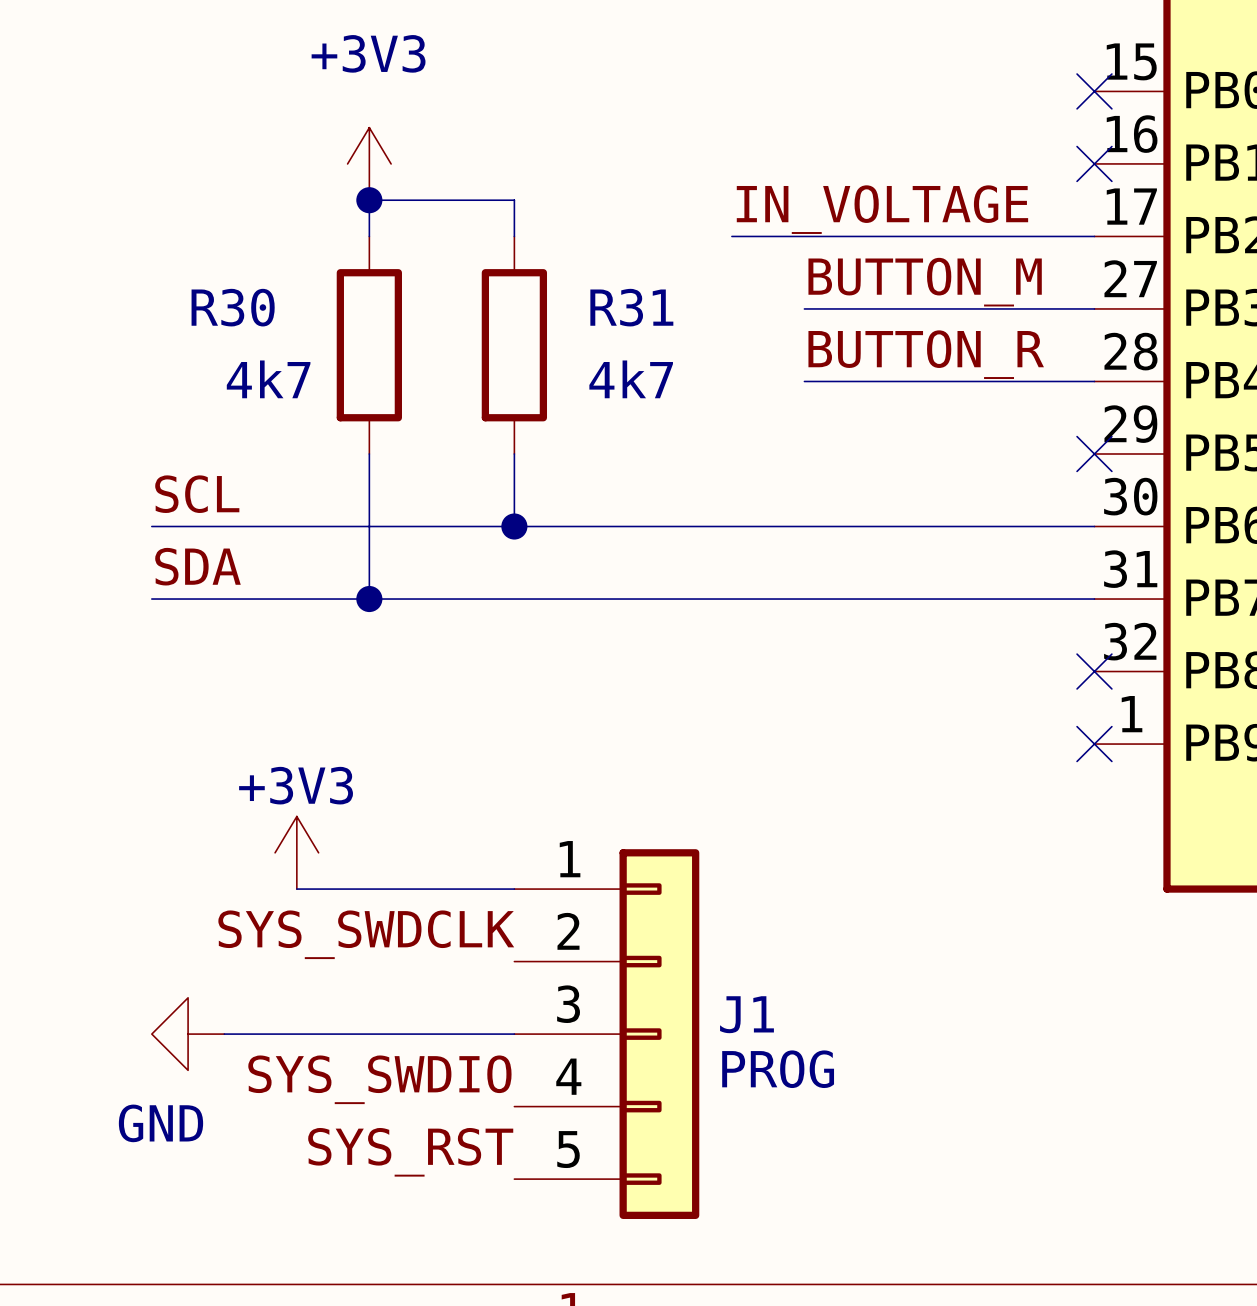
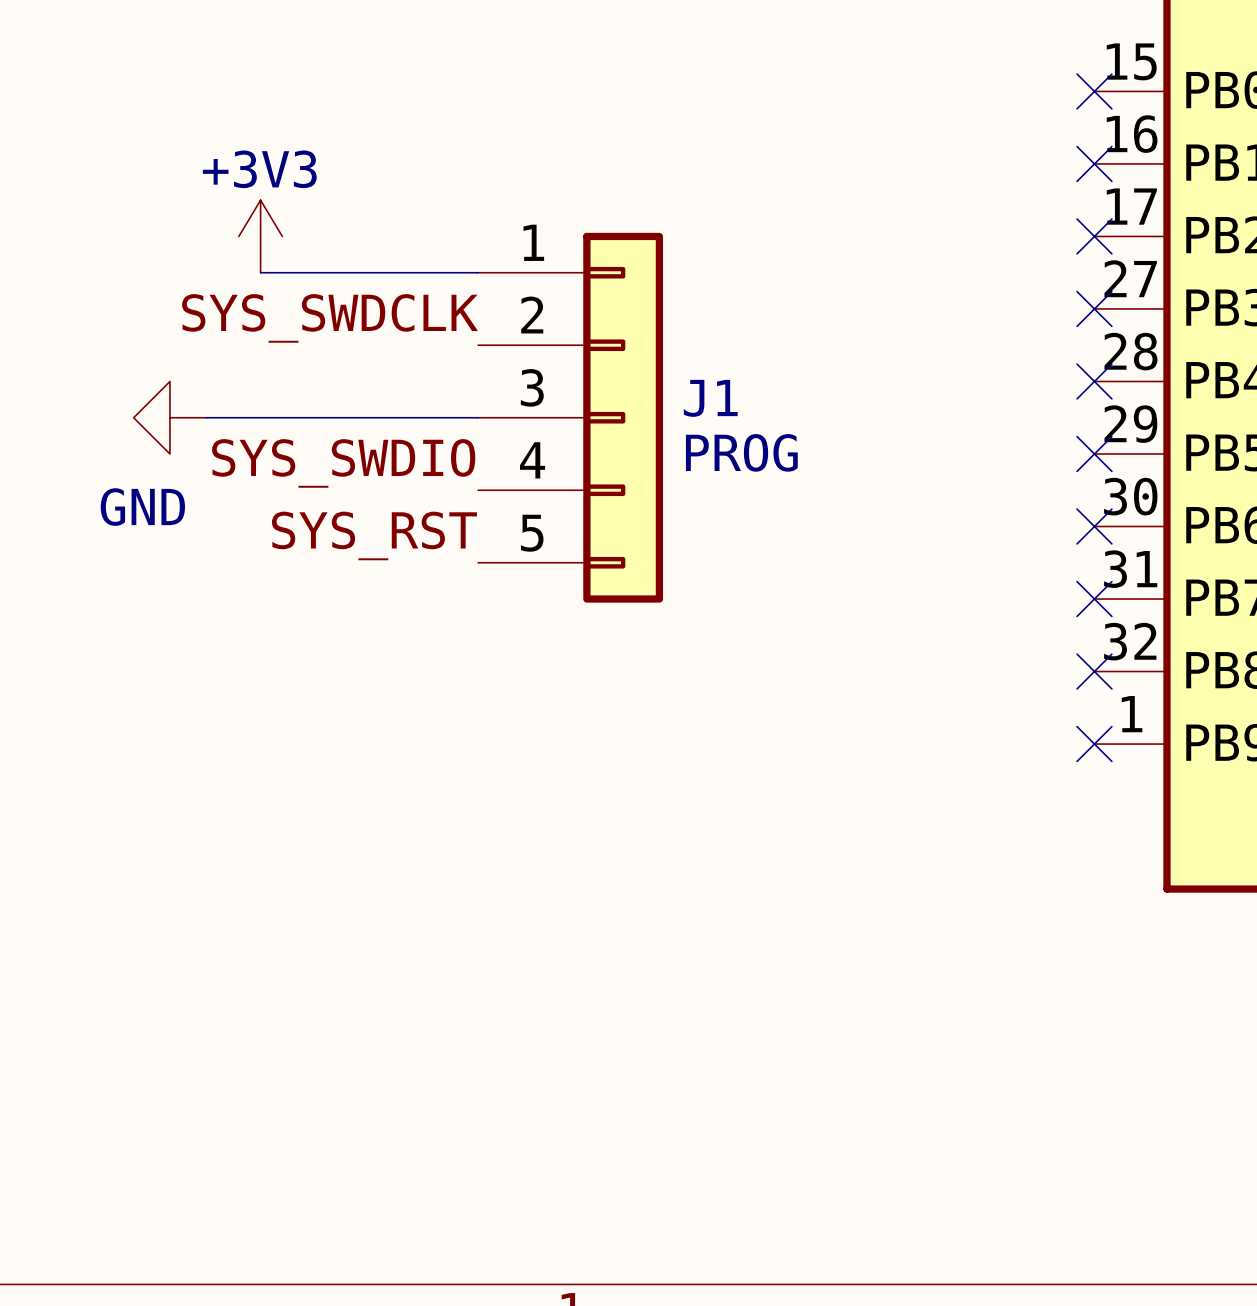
power symbol text position: +3V3 (368, 53) -> +3V3 (259, 169)
power symbol position: +3V3 (369, 163) -> +3V3 (260, 236)
junction: (369, 200) -> none
label: IN_VOLTAGE (882, 209) -> none
wire: (369, 236) (369, 200) (514, 200) (514, 236) -> none
wire: (731, 236) (1094, 236) -> none
no-connect mark: none -> (1094, 236)
label: BUTTON_M (925, 282) -> none
wire: (804, 308) (1094, 308) -> none
no-connect mark: none -> (1094, 308)
R30: 4k7 (369, 345) -> none
R31: 4k7 (514, 345) -> none
label: BUTTON_R (926, 354) -> none
wire: (804, 381) (1094, 381) -> none
no-connect mark: none -> (1094, 381)
wire: none -> (206, 417) (478, 417)
wire: (369, 453) (369, 599) -> none
wire: (514, 453) (514, 526) -> none
label: SCL (197, 494) -> none
wire: (151, 526) (1094, 526) -> none
junction: (514, 526) -> none
no-connect mark: none -> (1094, 526)
label: SDA (197, 566) -> none
wire: (151, 599) (1094, 599) -> none
junction: (369, 599) -> none
no-connect mark: none -> (1094, 599)
power symbol: +3V3 (296, 852) -> none
wire: (296, 889) (514, 889) -> (260, 272) (478, 272)
label position: SYS_SWDCLK (366, 934) -> SYS_SWDCLK (330, 318)
power symbol position: GND (188, 1034) -> GND (169, 417)
wire: (224, 1034) (514, 1034) -> none
J1 position: (606, 1034) -> (570, 417)
label position: SYS_SWDIO (379, 1079) -> SYS_SWDIO (343, 463)
label position: SYS_RST (410, 1152) -> SYS_RST (374, 535)

